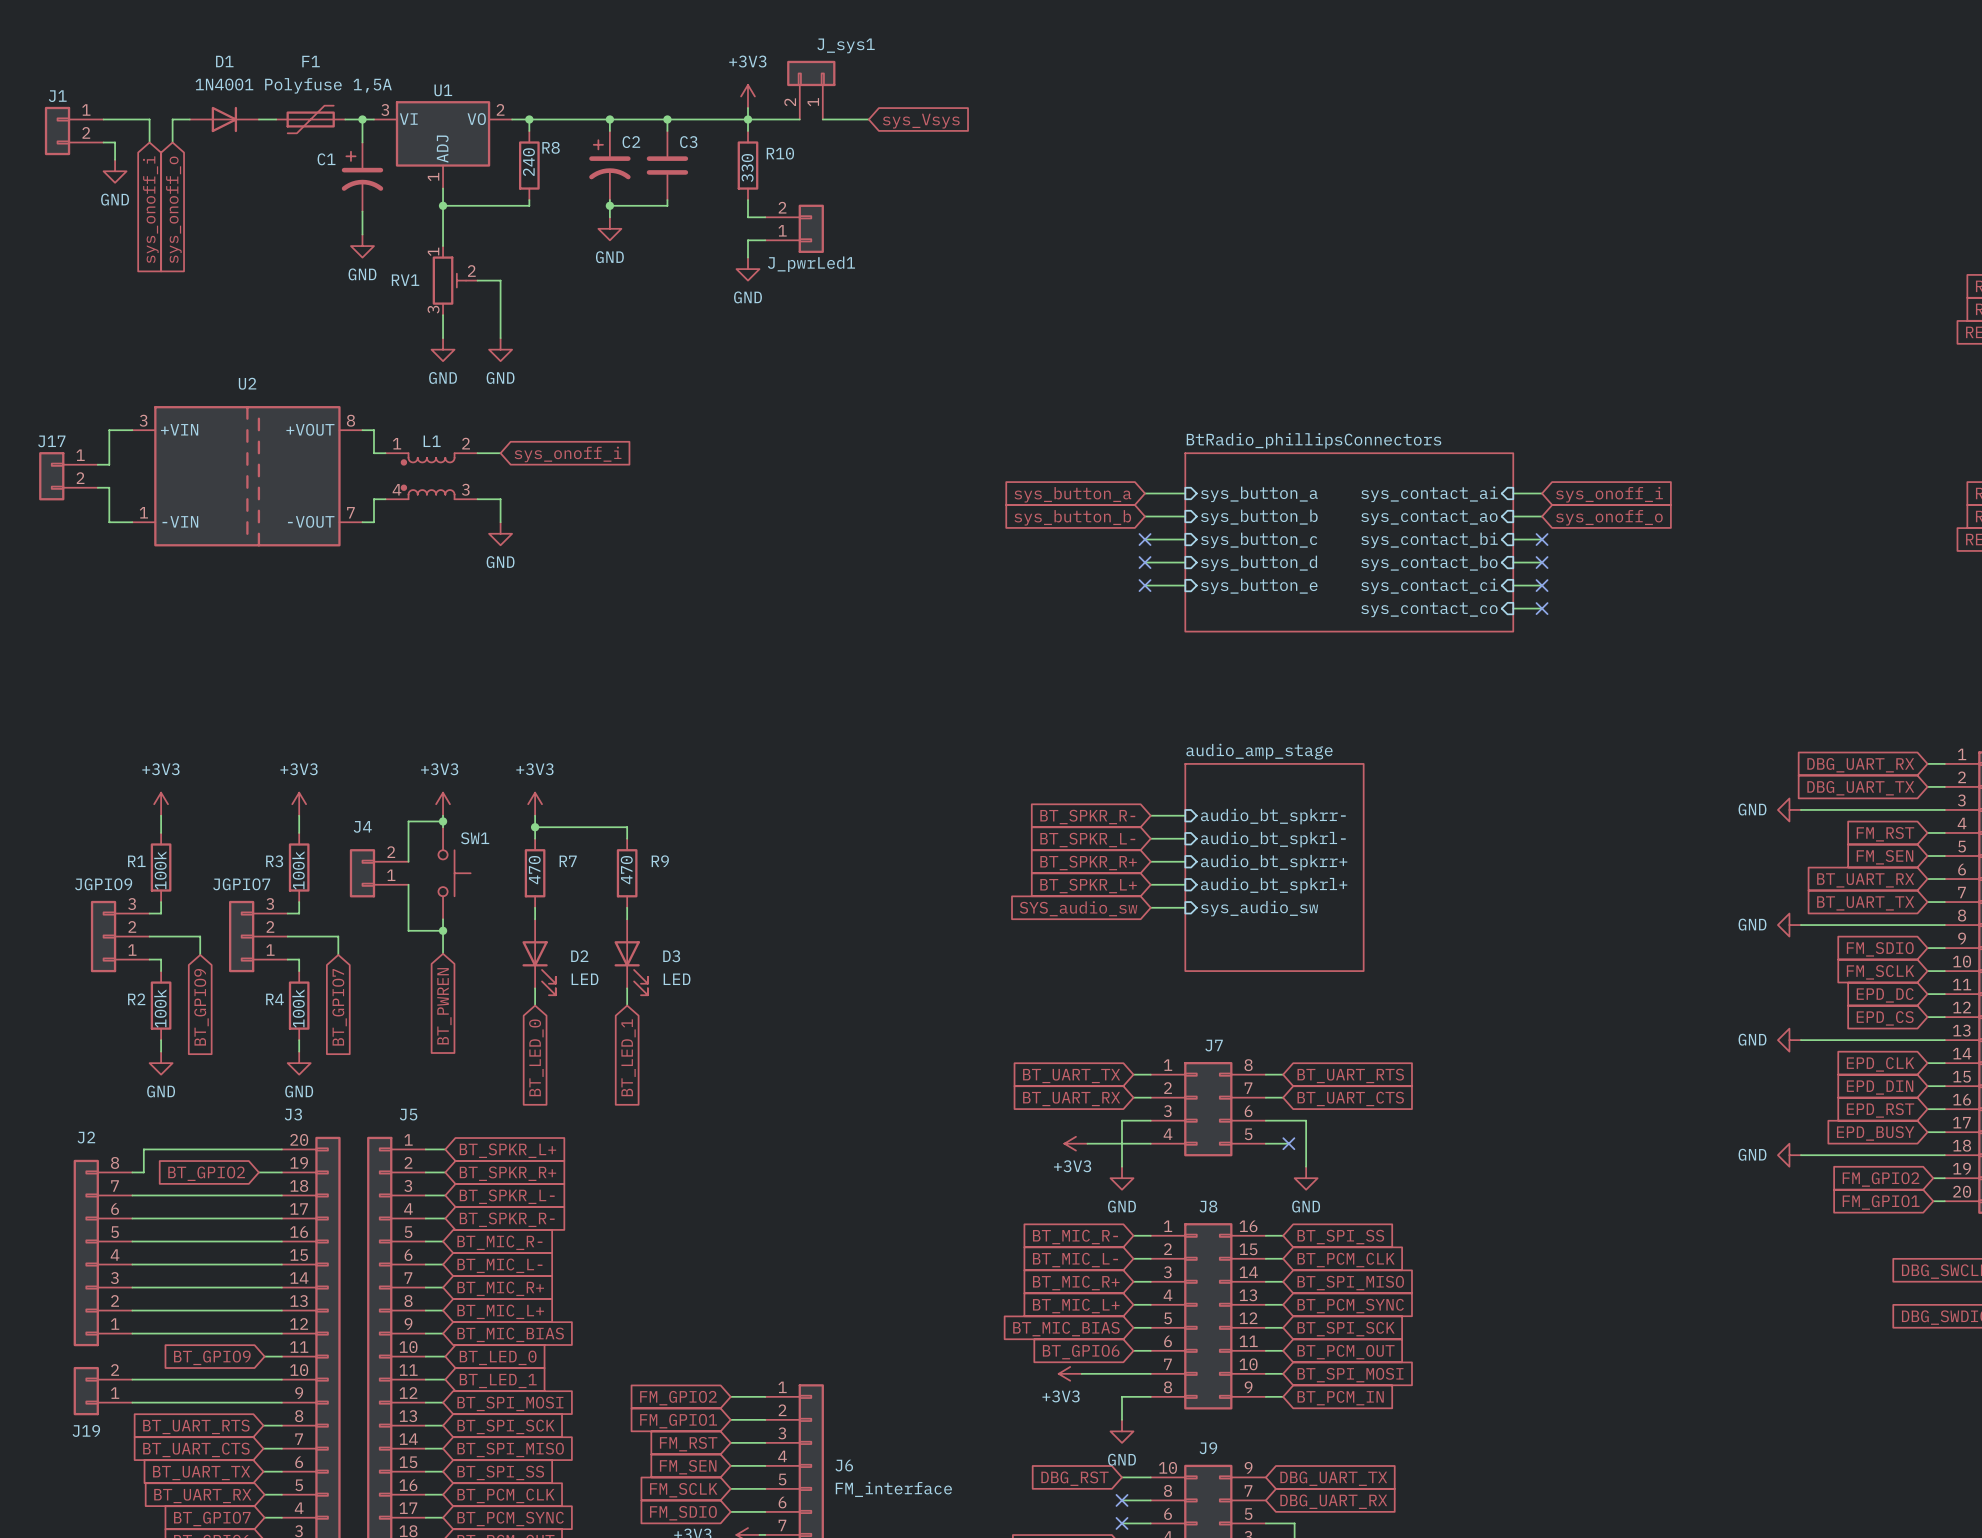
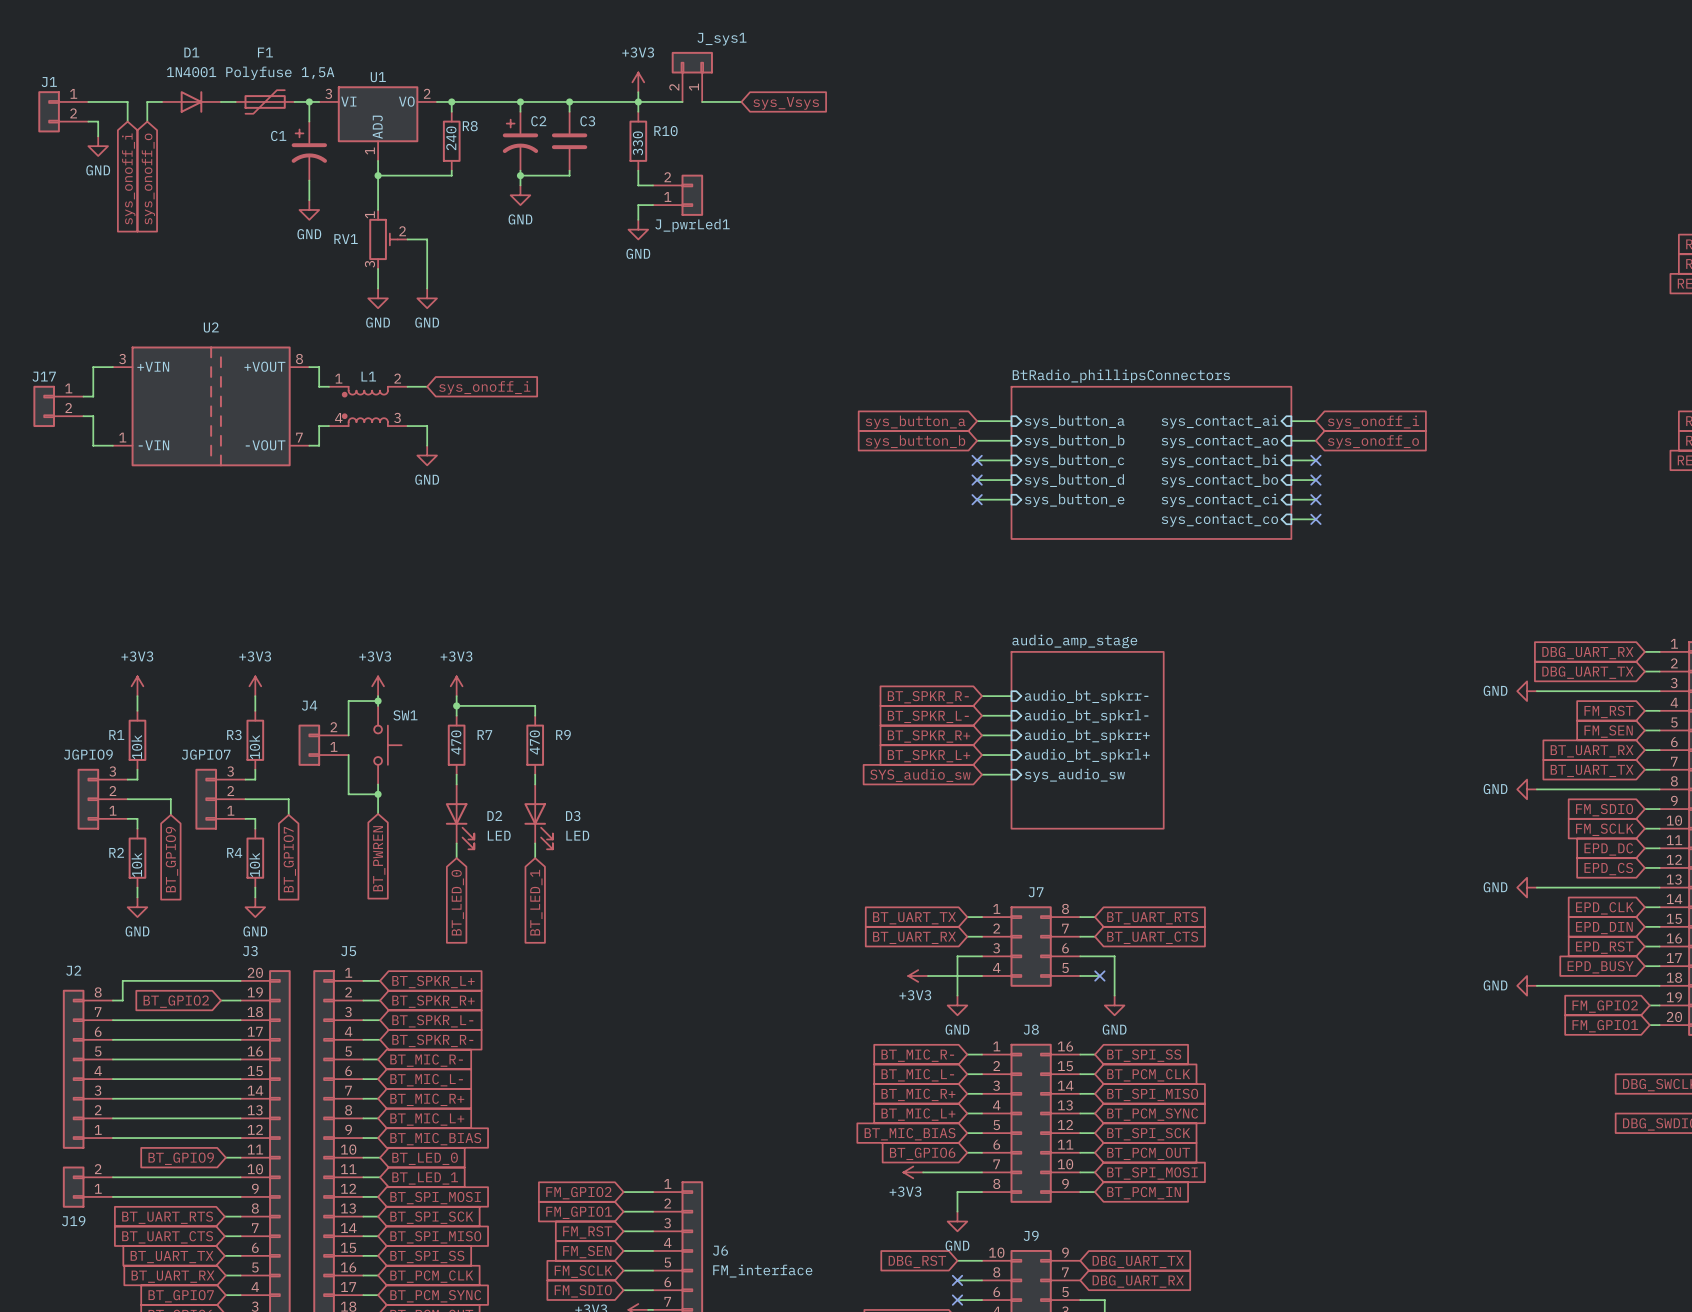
R1 value: 100k (160, 870) -> 10k (136, 747)
R3 value: 100k (298, 870) -> 10k (254, 747)
R2 value: 100k (160, 1008) -> 10k (136, 864)
R4 value: 100k (298, 1008) -> 10k (254, 864)

